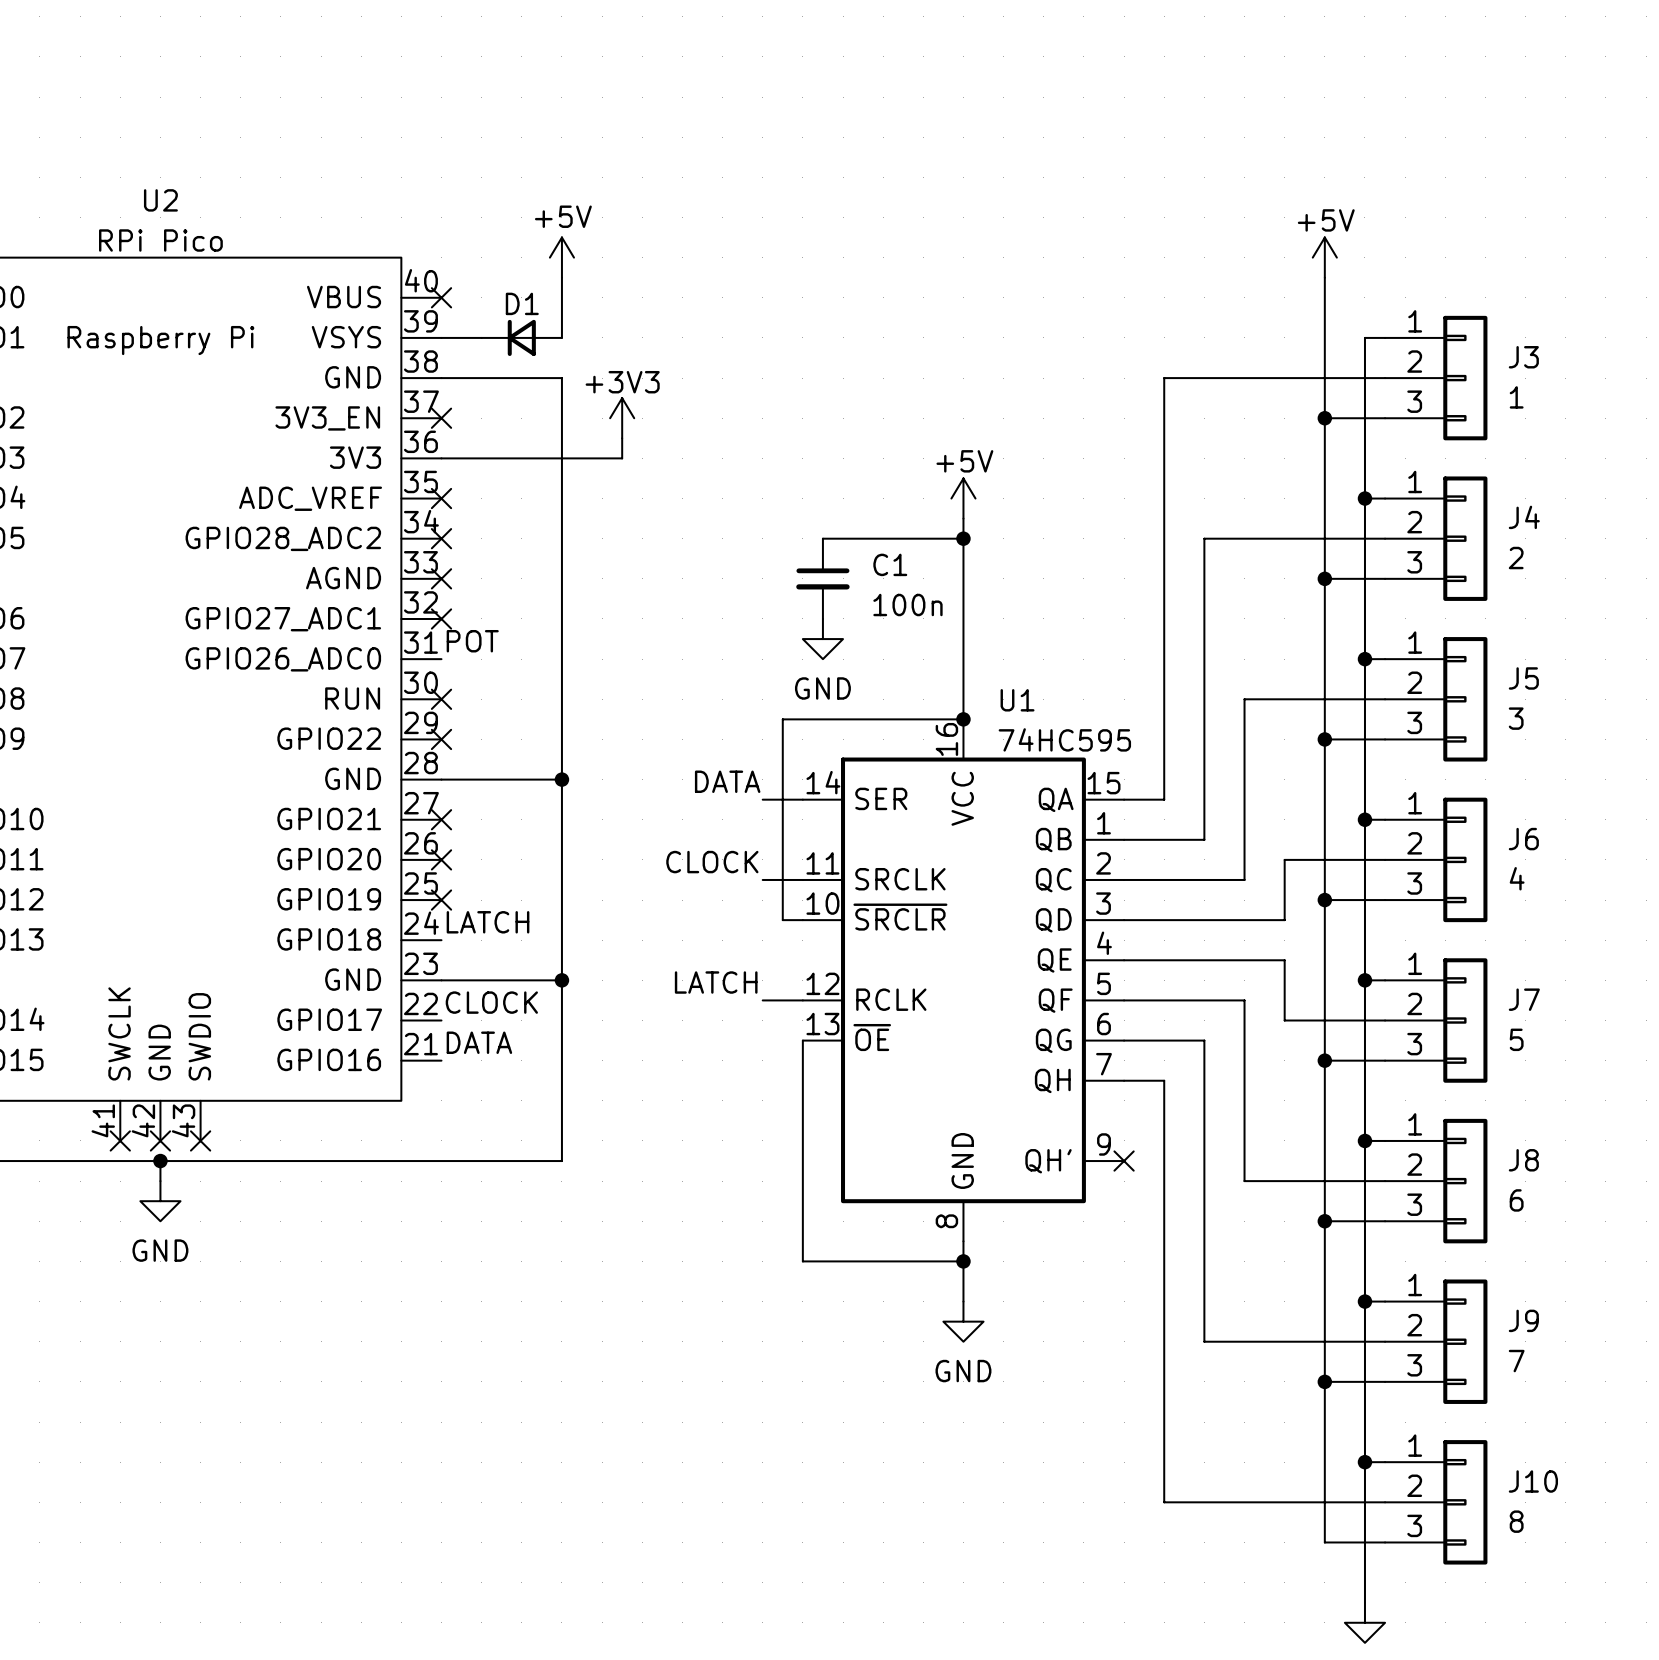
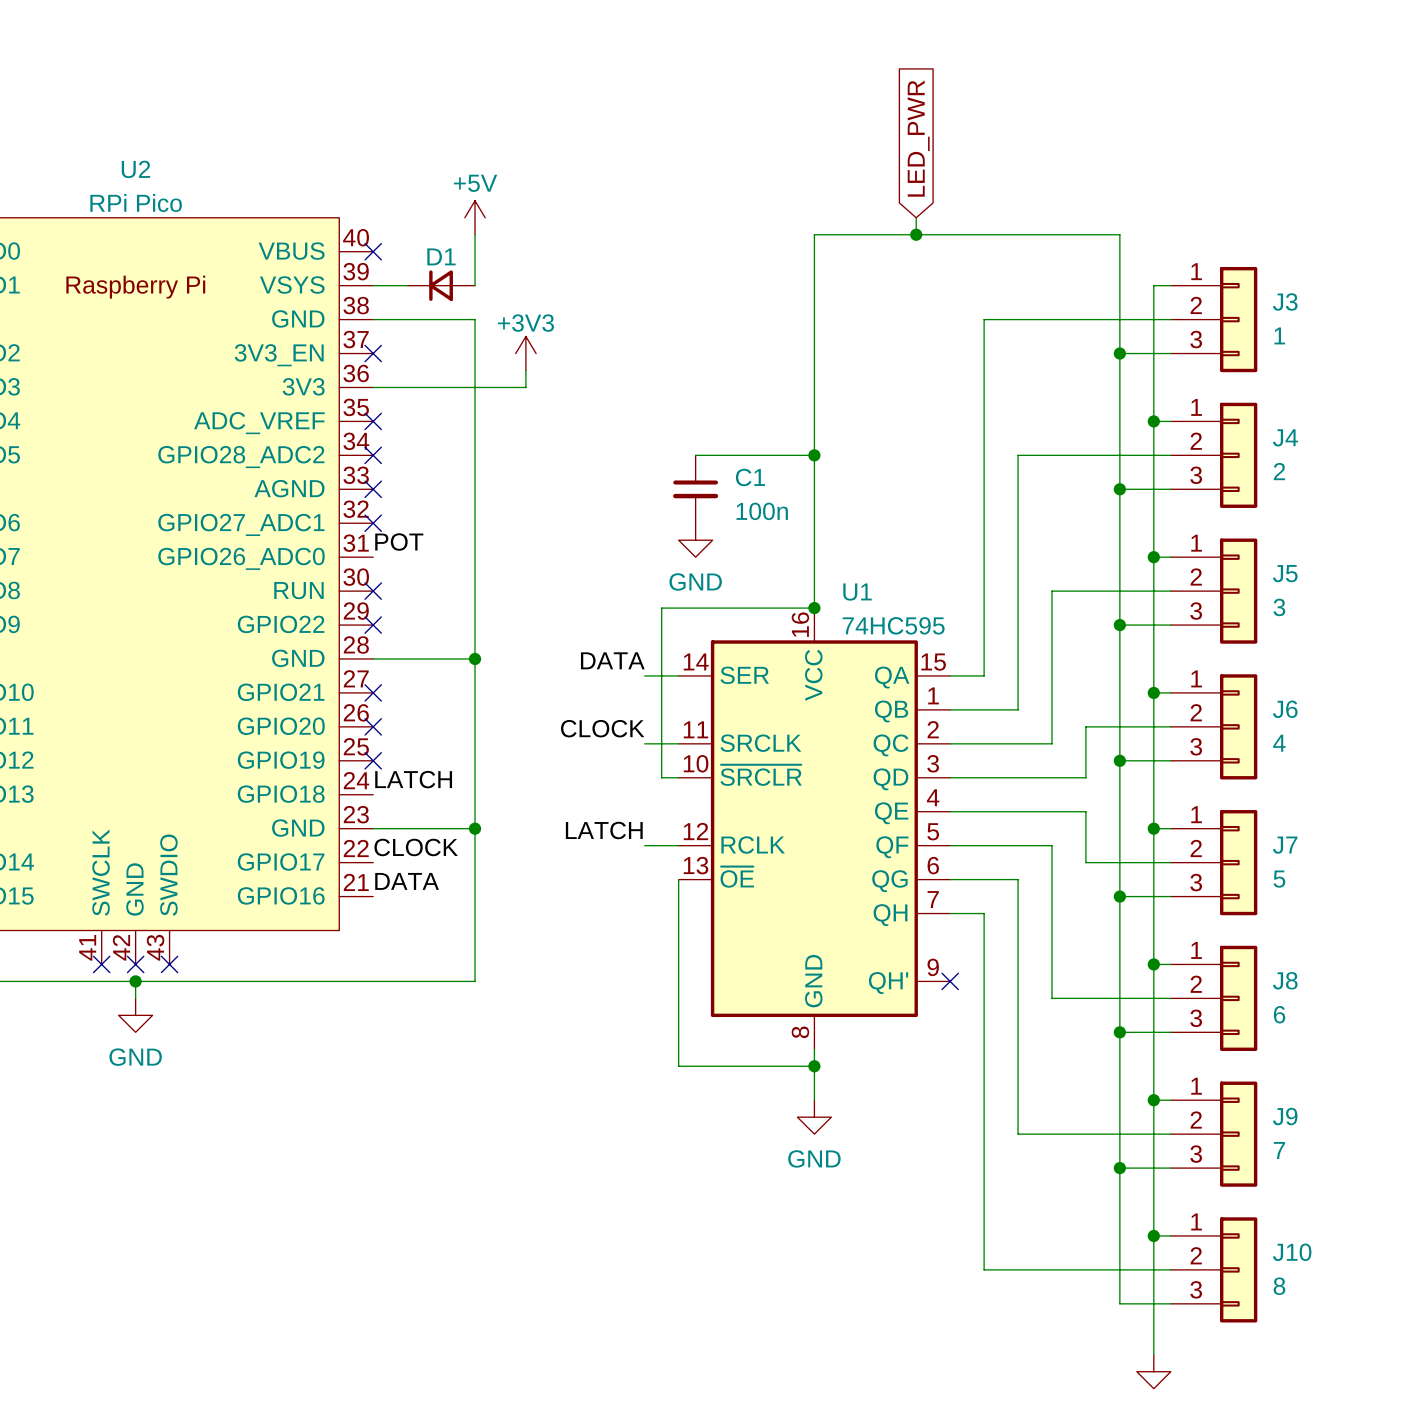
global label: none -> LED_PWR (918, 138)
wire: none -> (916, 217) (916, 234)
power symbol: +5V (1324, 257) -> none
junction: none -> (916, 234)
wire: none -> (1119, 234) (814, 234) (814, 438)
power symbol: +5V (963, 498) -> none

